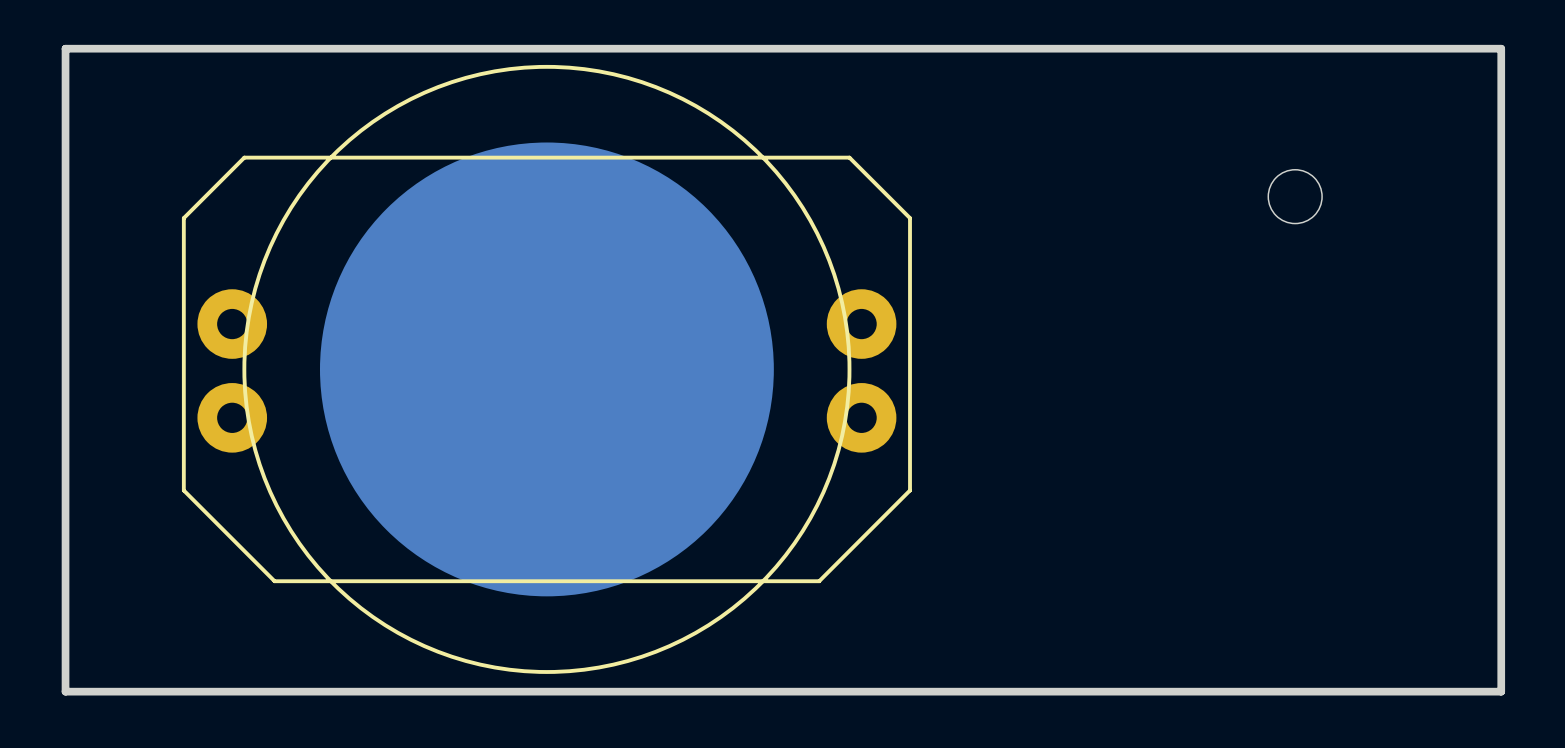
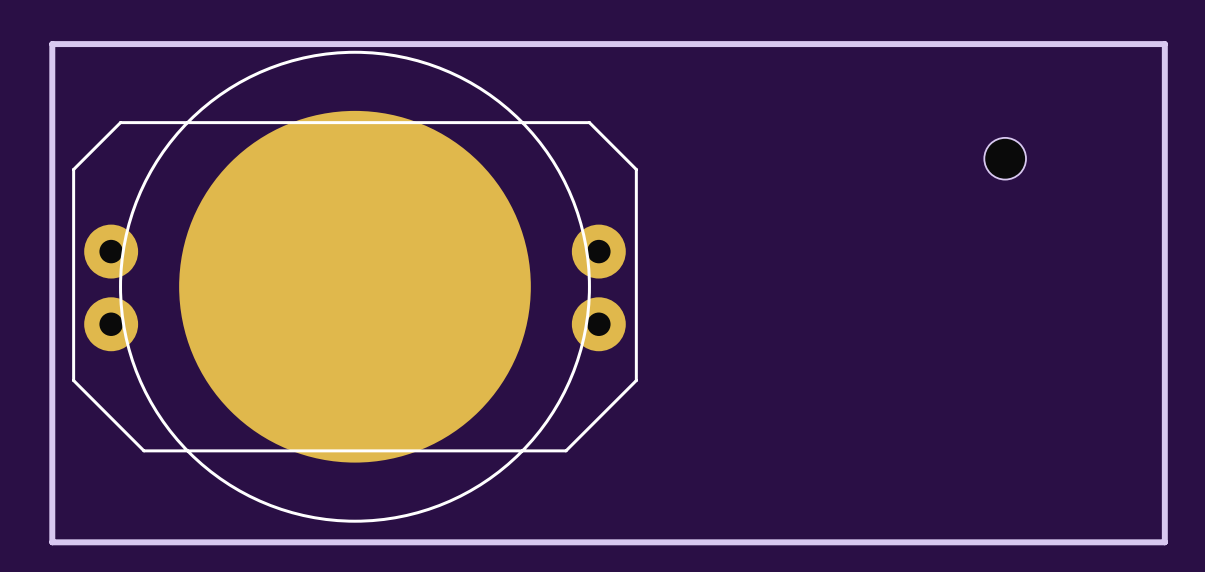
part position: (546, 369) -> (354, 286)

